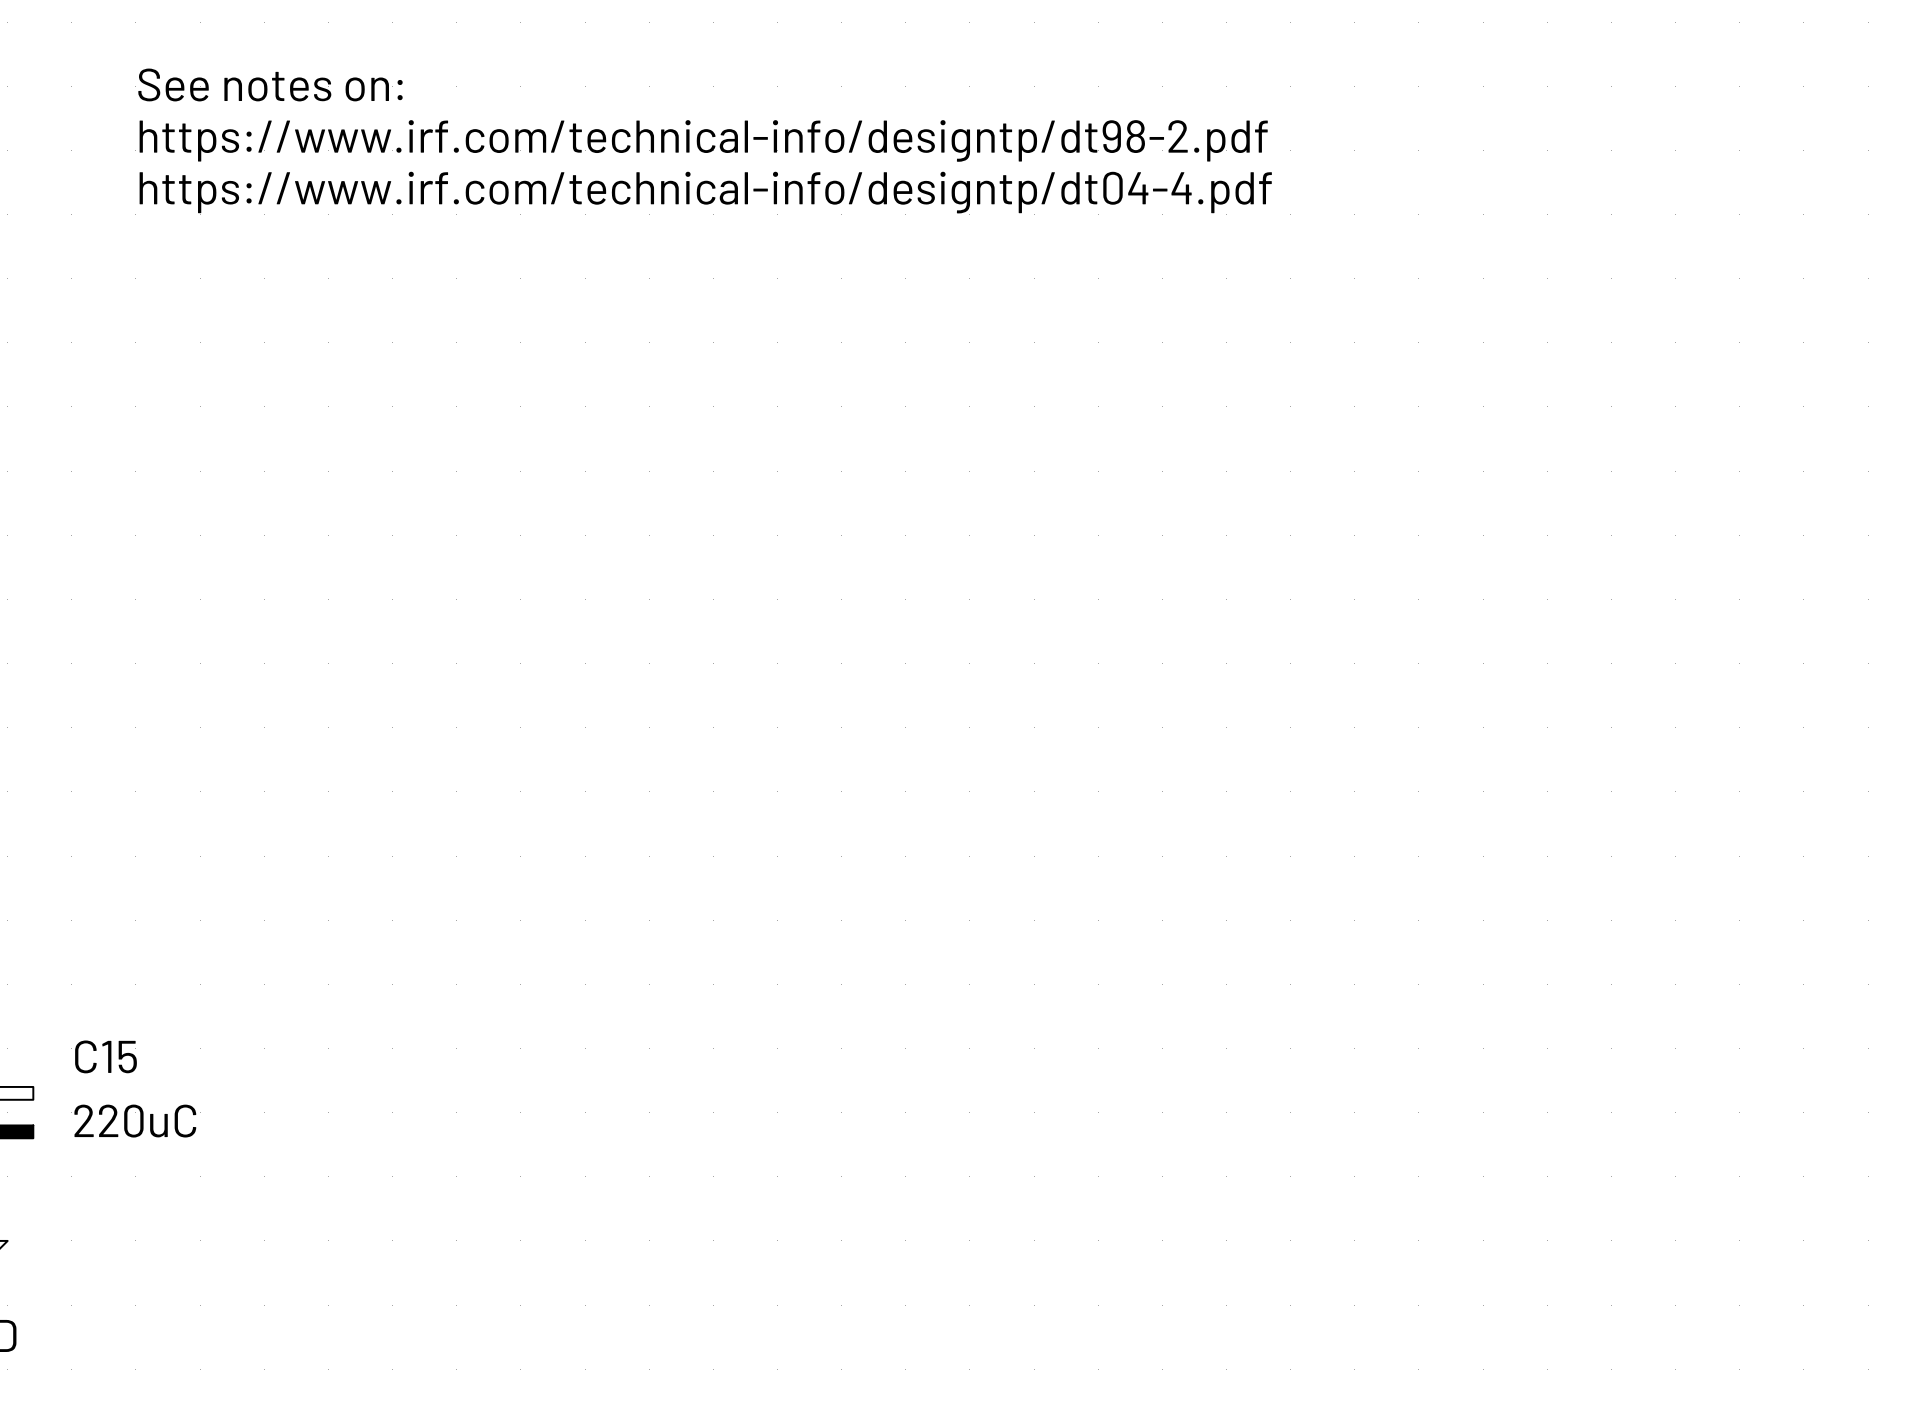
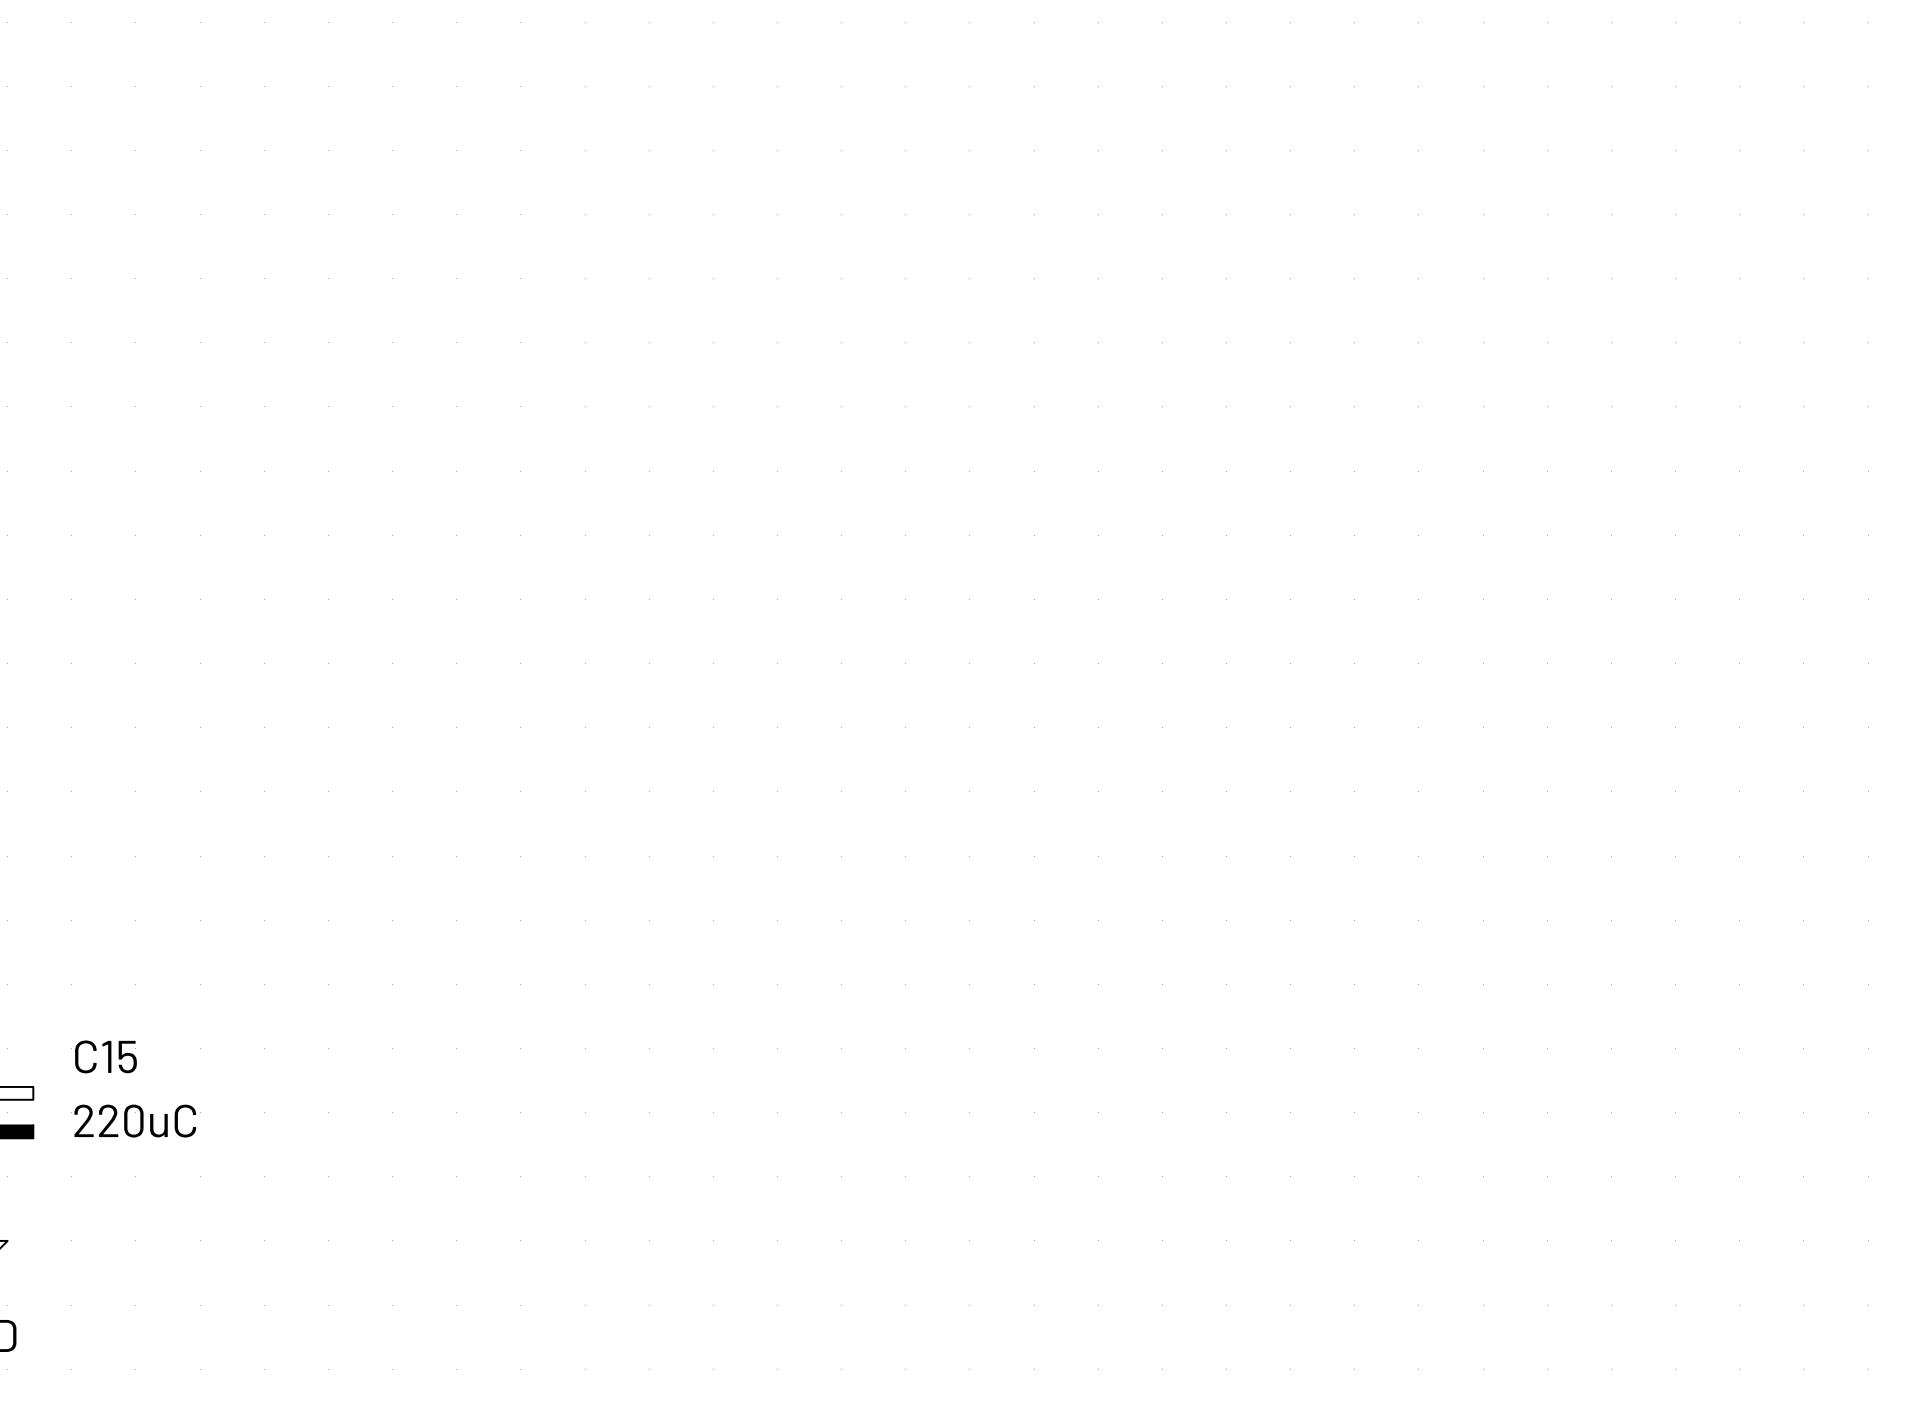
text: See notes on: (270, 84) -> none
text: https://www.irf.com/technical-info/designtp/dt98-2.pdf (703, 140) -> none
text: https://www.irf.com/technical-info/designtp/dt04-4.pdf (705, 192) -> none

